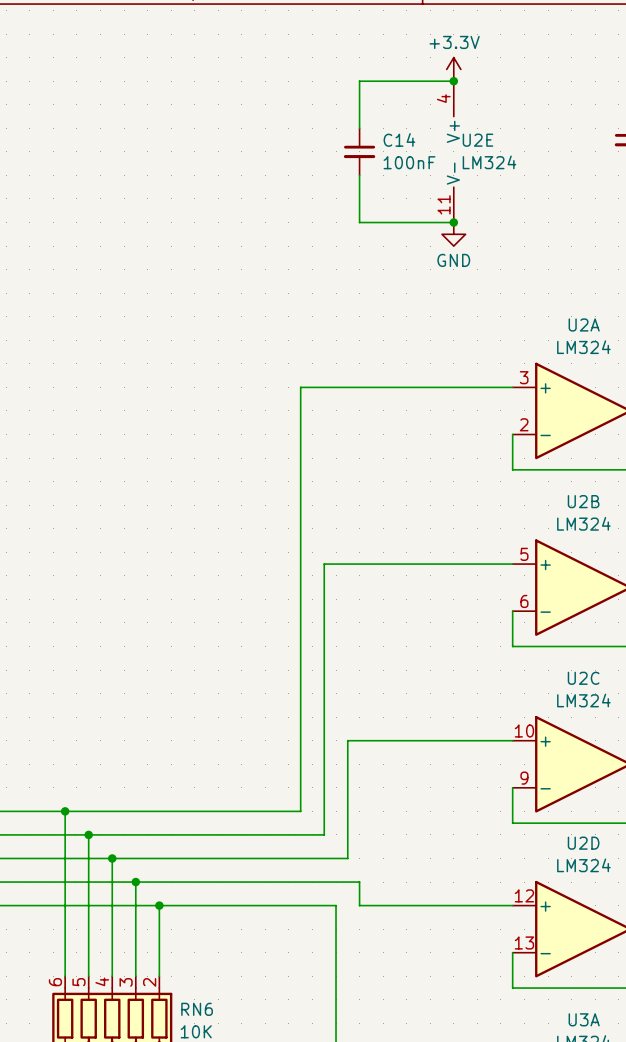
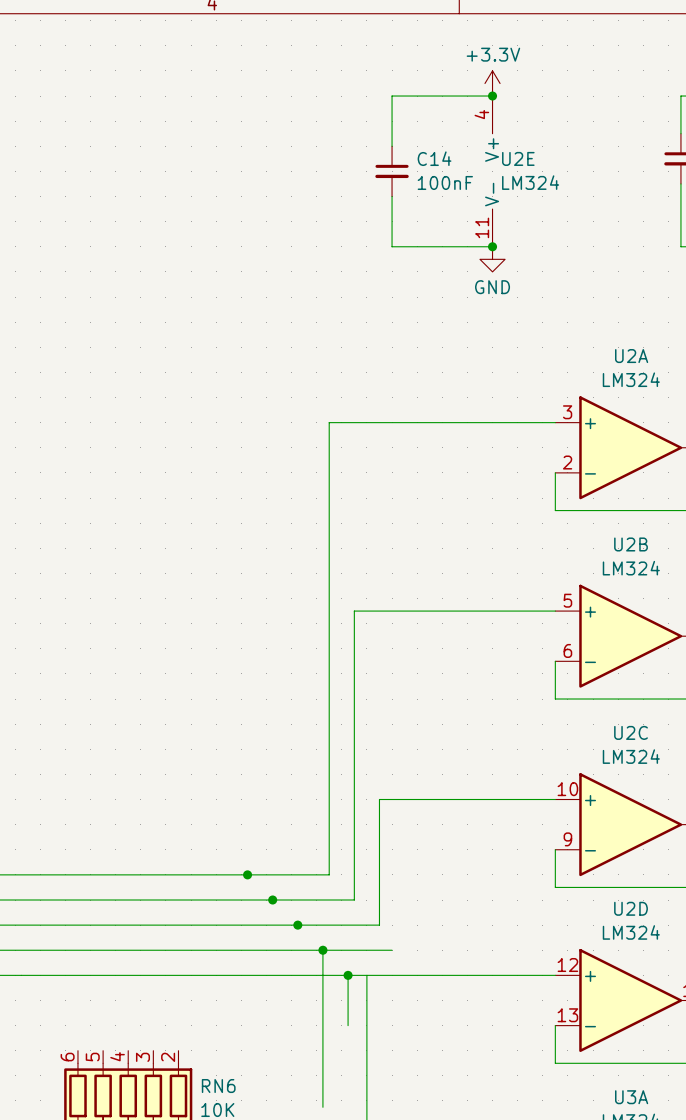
wire: (65, 811) (65, 976) -> none
junction: (65, 811) -> none
junction: none -> (247, 874)
wire: (88, 834) (88, 976) -> none
junction: (88, 834) -> none
junction: none -> (272, 900)
wire: (112, 858) (112, 976) -> none
junction: (112, 858) -> none
junction: none -> (297, 925)
wire: (135, 882) (135, 976) -> none
junction: (135, 882) -> none
wire: none -> (322, 950) (322, 1107)
junction: none -> (322, 950)
wire: (359, 882) (359, 905) -> (366, 975) (392, 975)
wire: (159, 905) (159, 976) -> none
junction: (159, 905) -> none
wire: none -> (348, 975) (348, 1025)
junction: none -> (348, 975)

